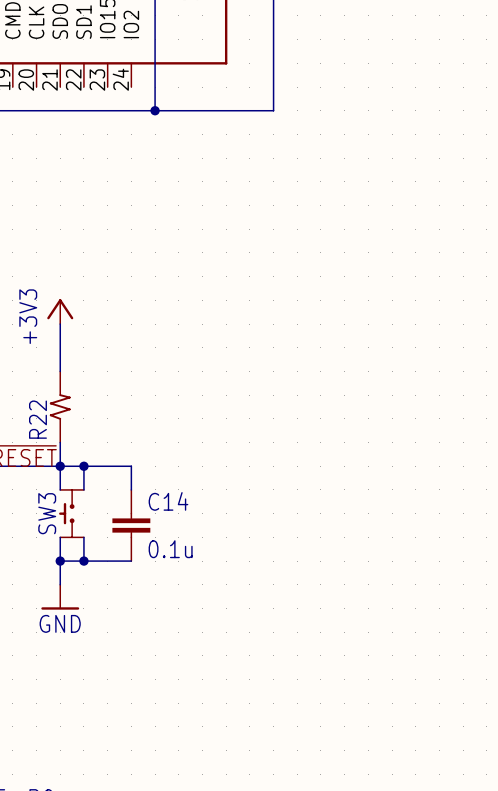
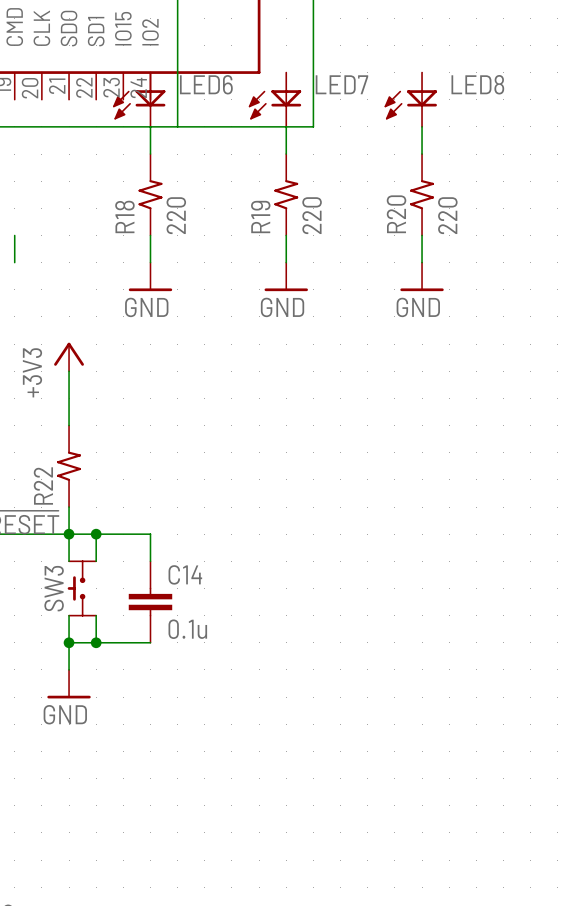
LED6: none -> (139, 99)
LED7: none -> (274, 99)
LED8: none -> (410, 99)
wire: none -> (150, 126) (150, 154)
junction: (155, 110) -> none
wire: none -> (286, 126) (286, 154)
wire: none -> (422, 126) (422, 154)
R18: none -> 220 (150, 194)
R19: none -> 220 (286, 194)
R20: none -> 220 (422, 194)
wire: none -> (14, 235) (14, 262)
wire: none -> (150, 235) (150, 262)
wire: none -> (286, 235) (286, 262)
wire: none -> (422, 235) (422, 262)
power symbol: none -> GND (150, 276)
power symbol: none -> GND (286, 276)
power symbol: none -> GND (422, 276)

